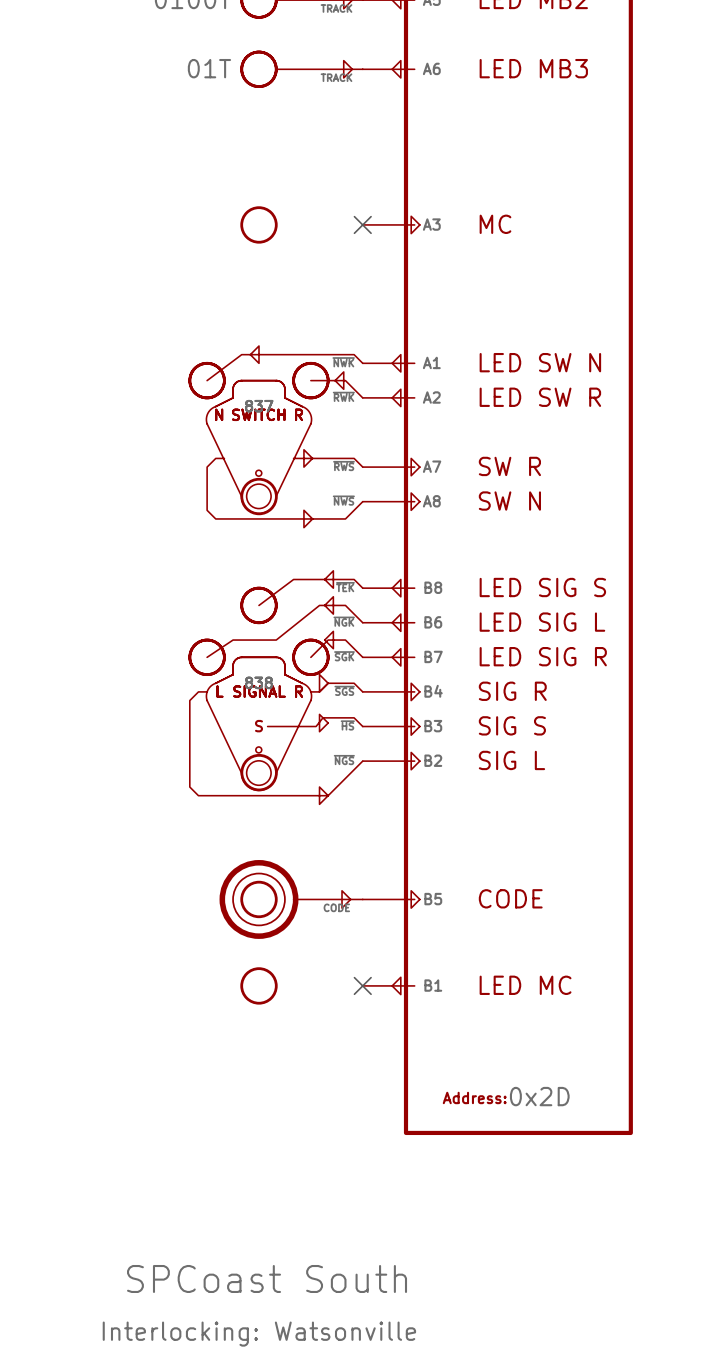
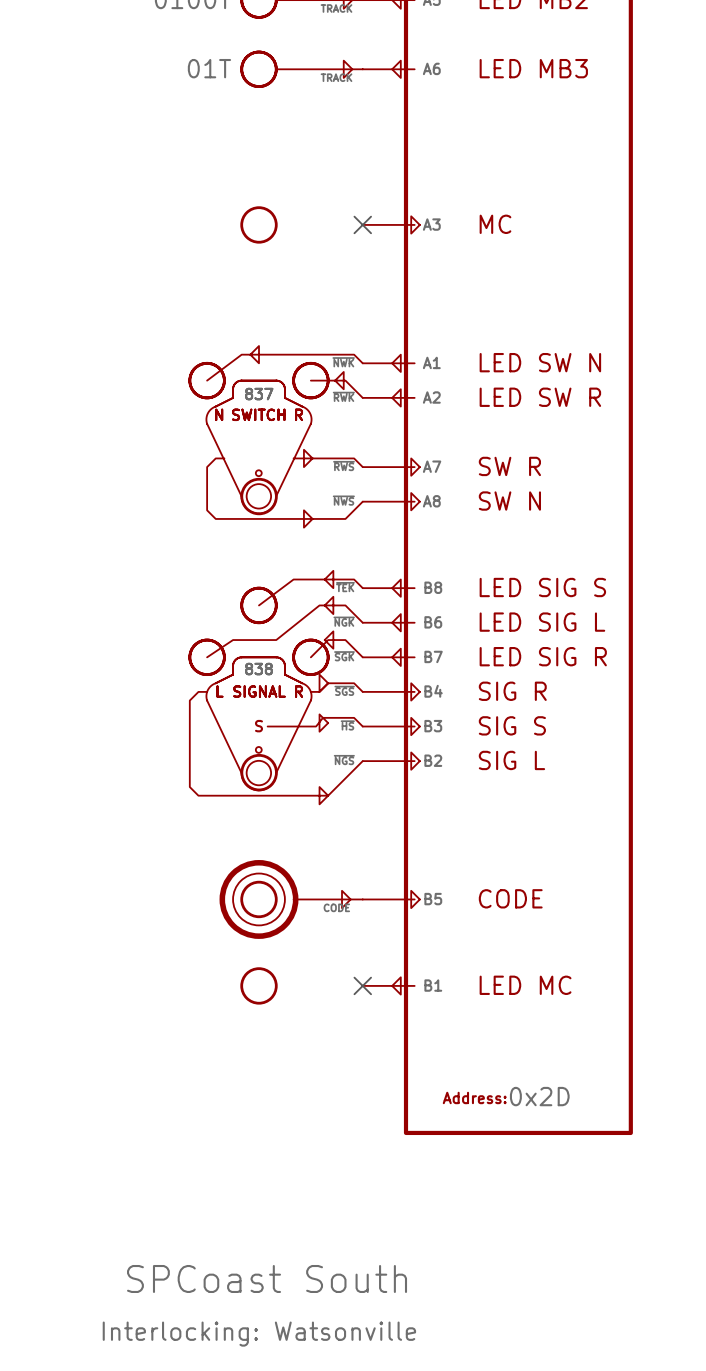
part value position: 837 (259, 406) -> 837 (259, 394)
part value position: 837 (259, 406) -> 837 (259, 394)
part value position: 838 (258, 682) -> 838 (258, 669)
part value position: 838 (258, 682) -> 838 (258, 669)

